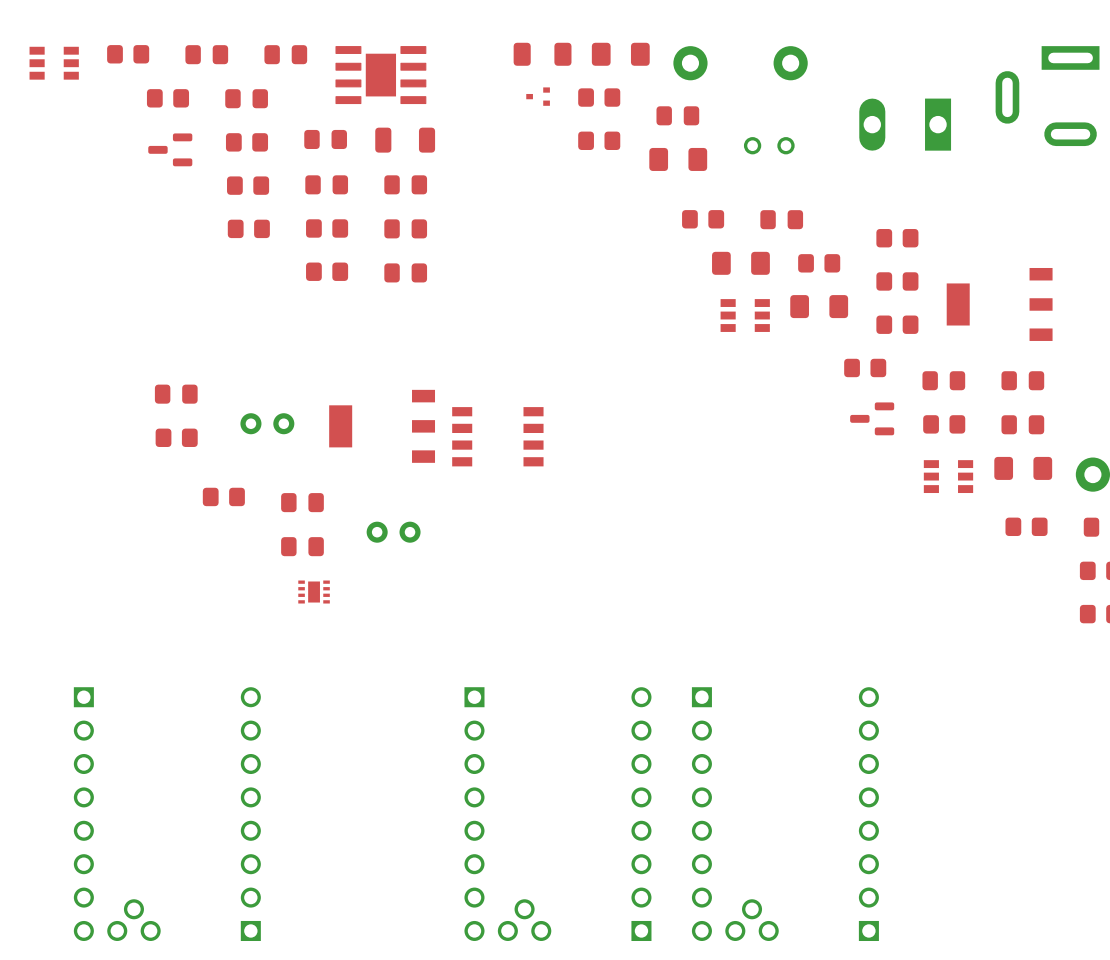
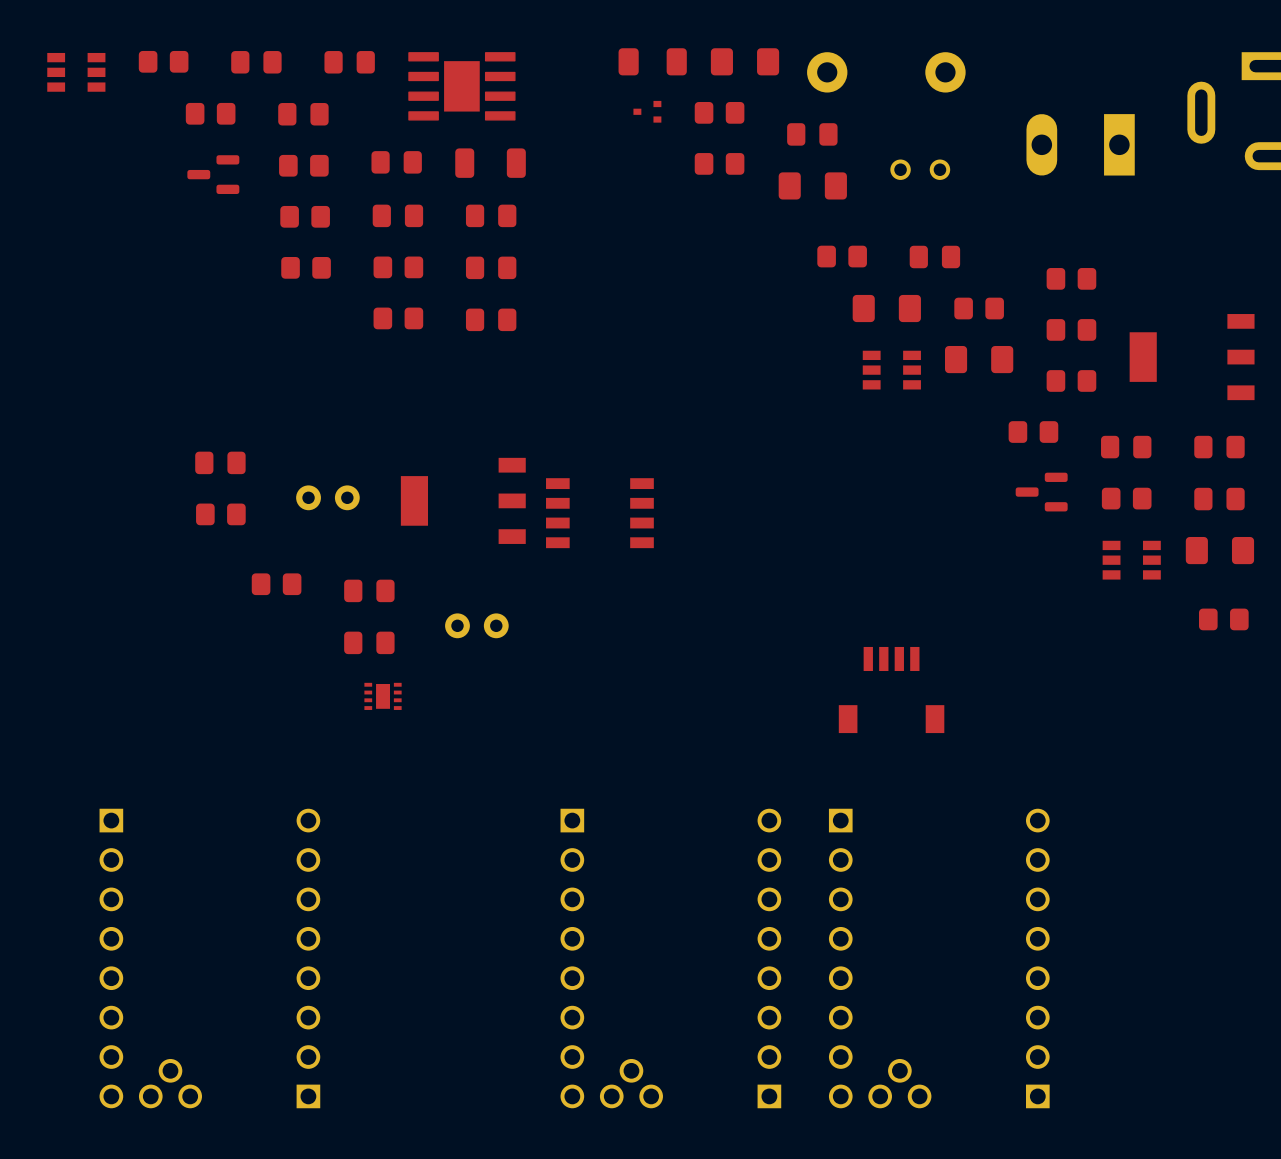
part: none -> (891, 690)

